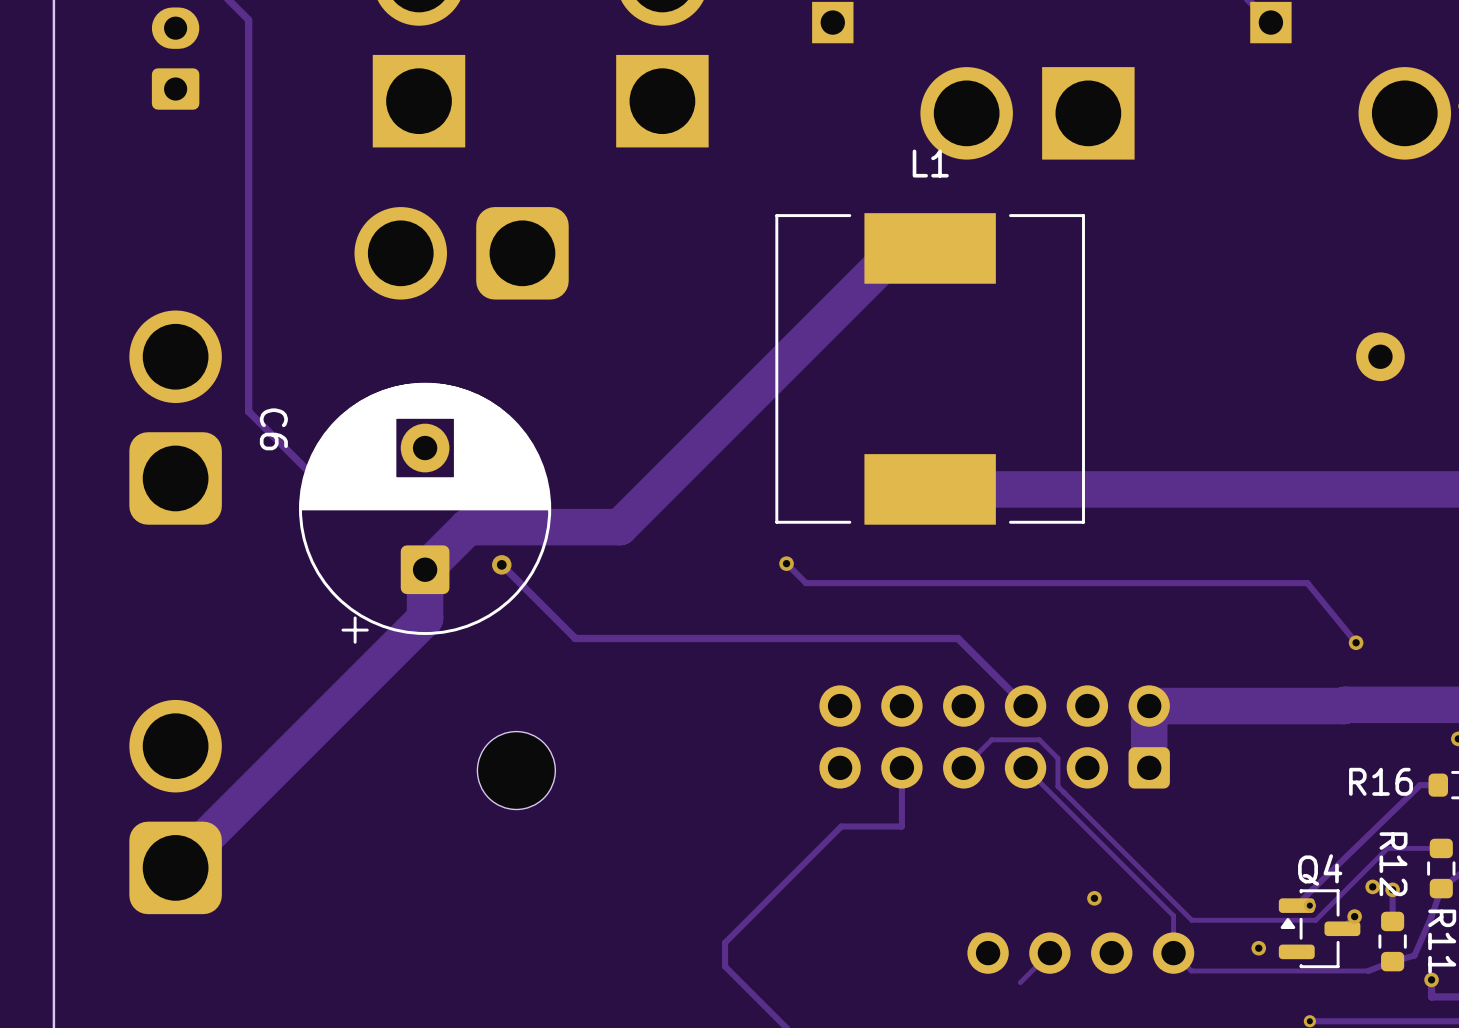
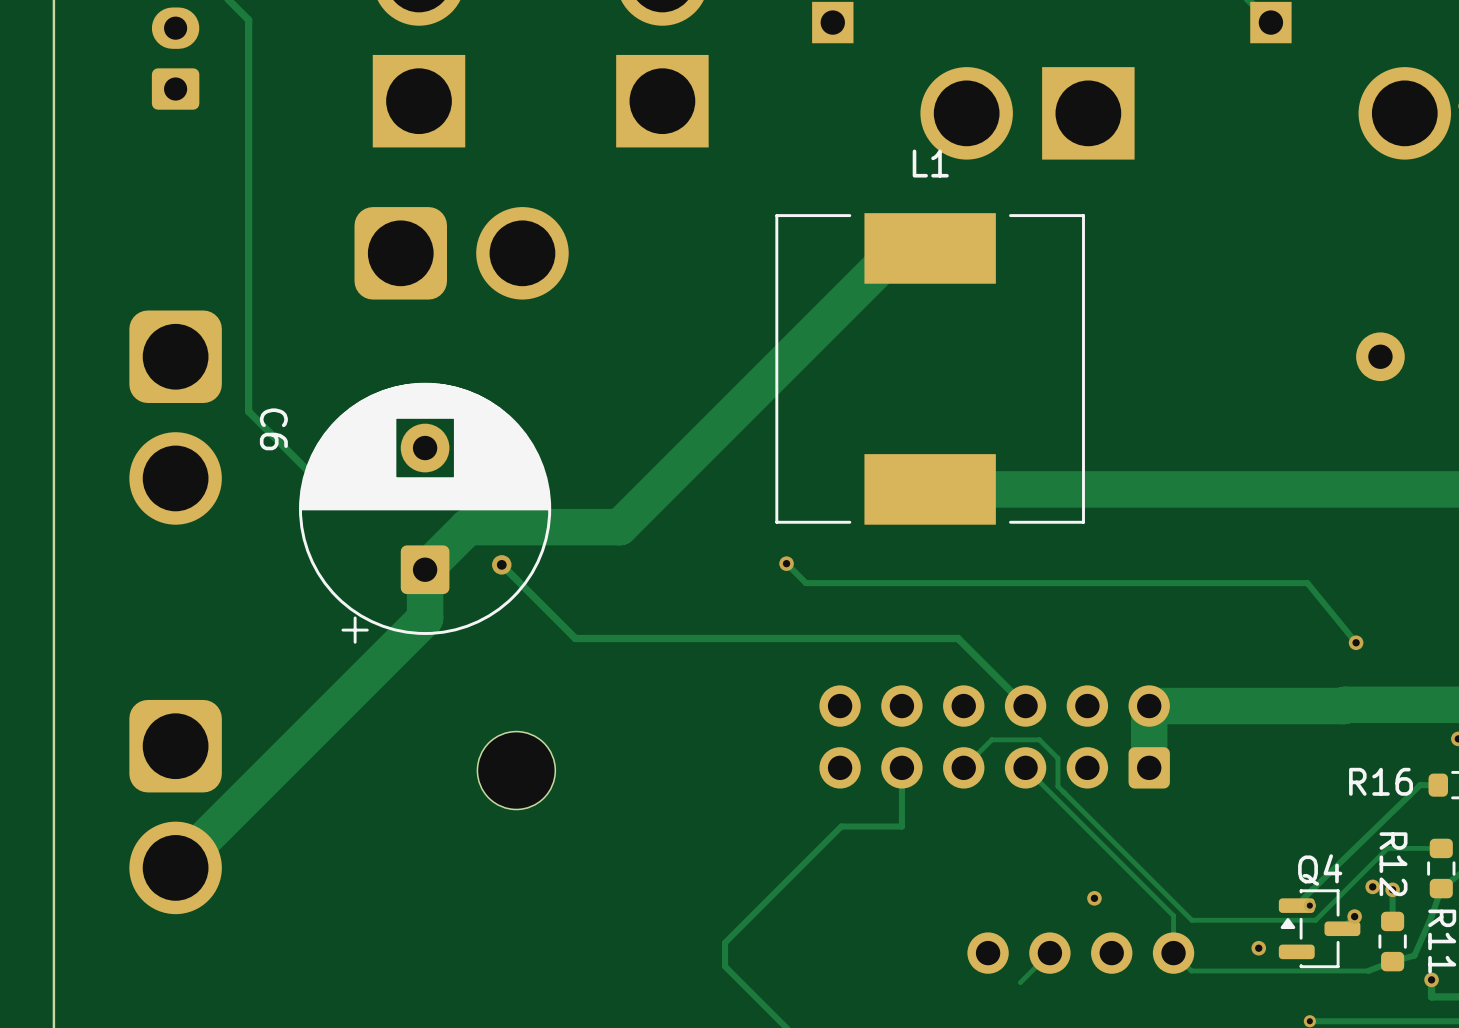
part rotation: 0° (461, 253) -> 180° (461, 253)
part rotation: 0° (175, 417) -> 180° (175, 417)
part rotation: 0° (175, 807) -> 180° (175, 807)

